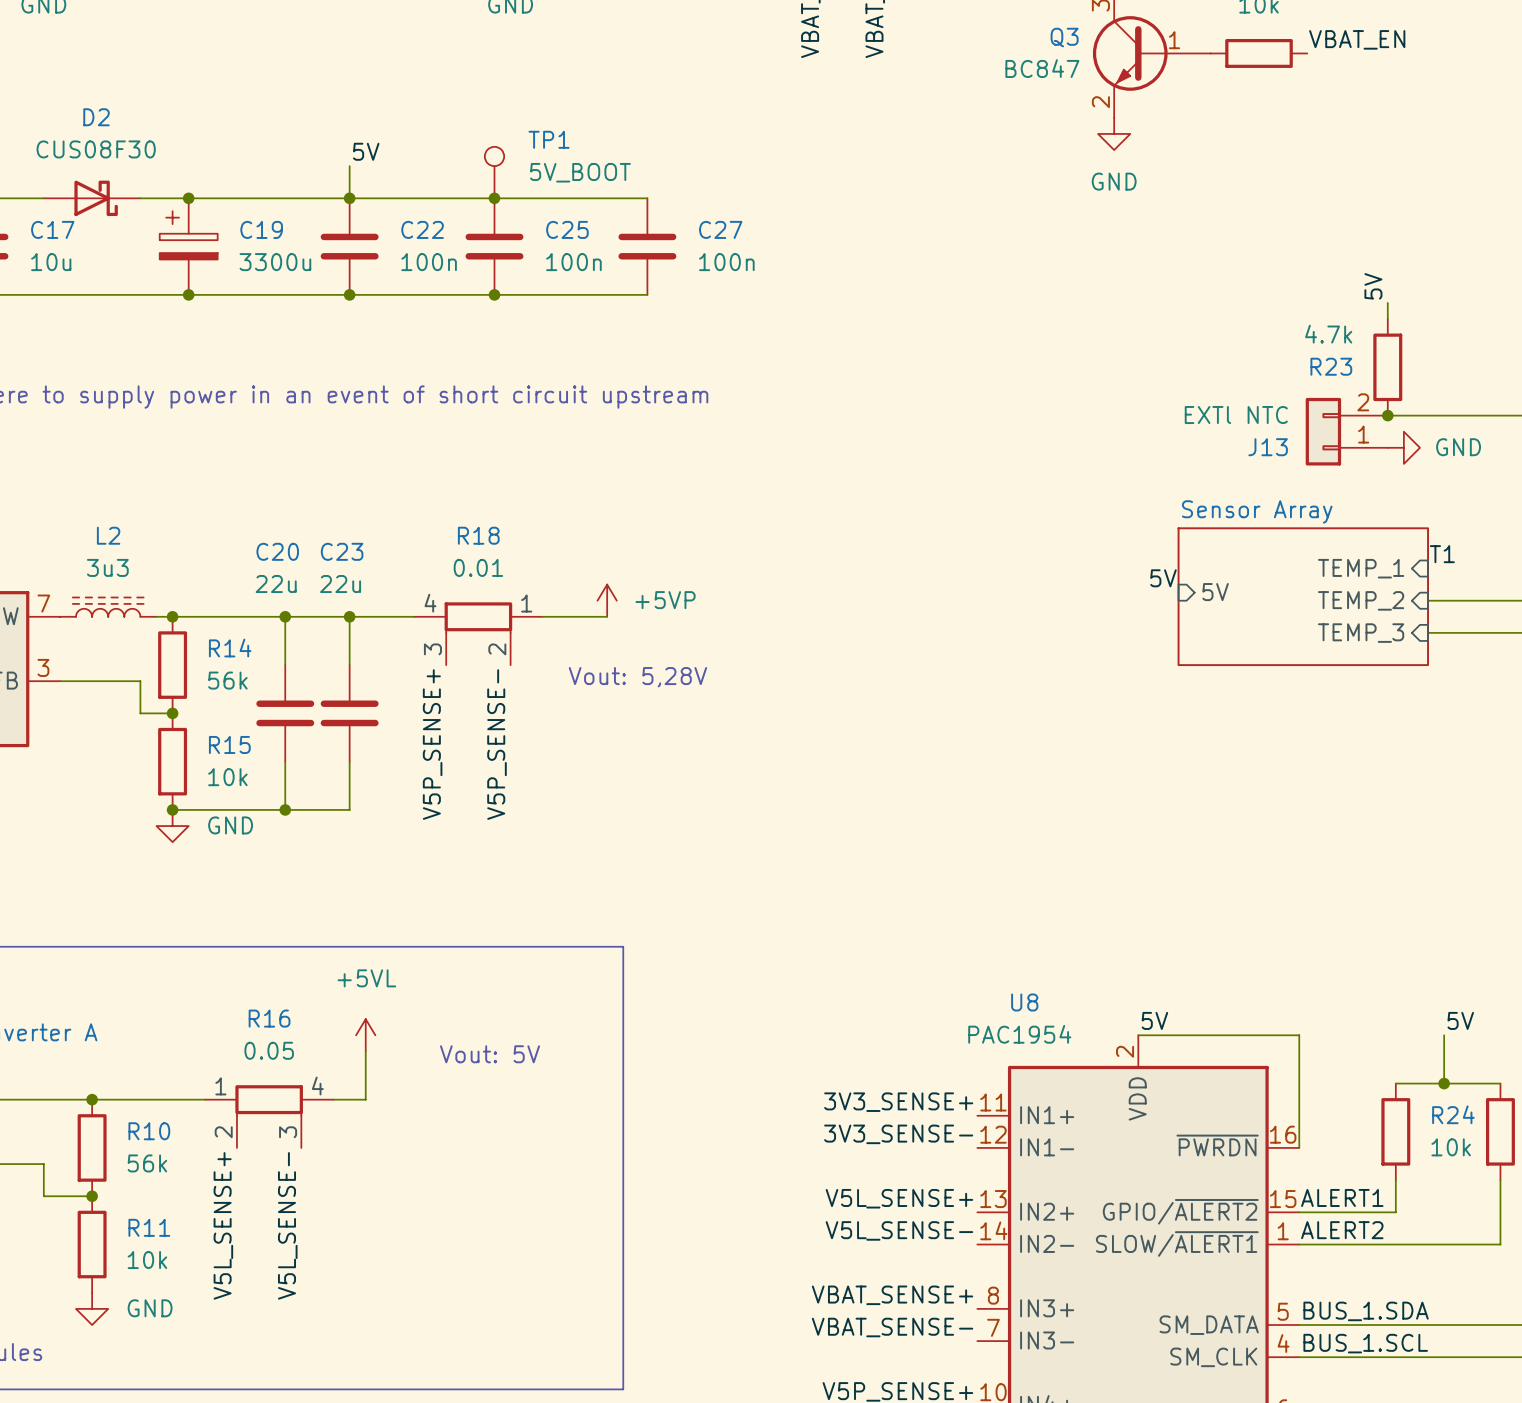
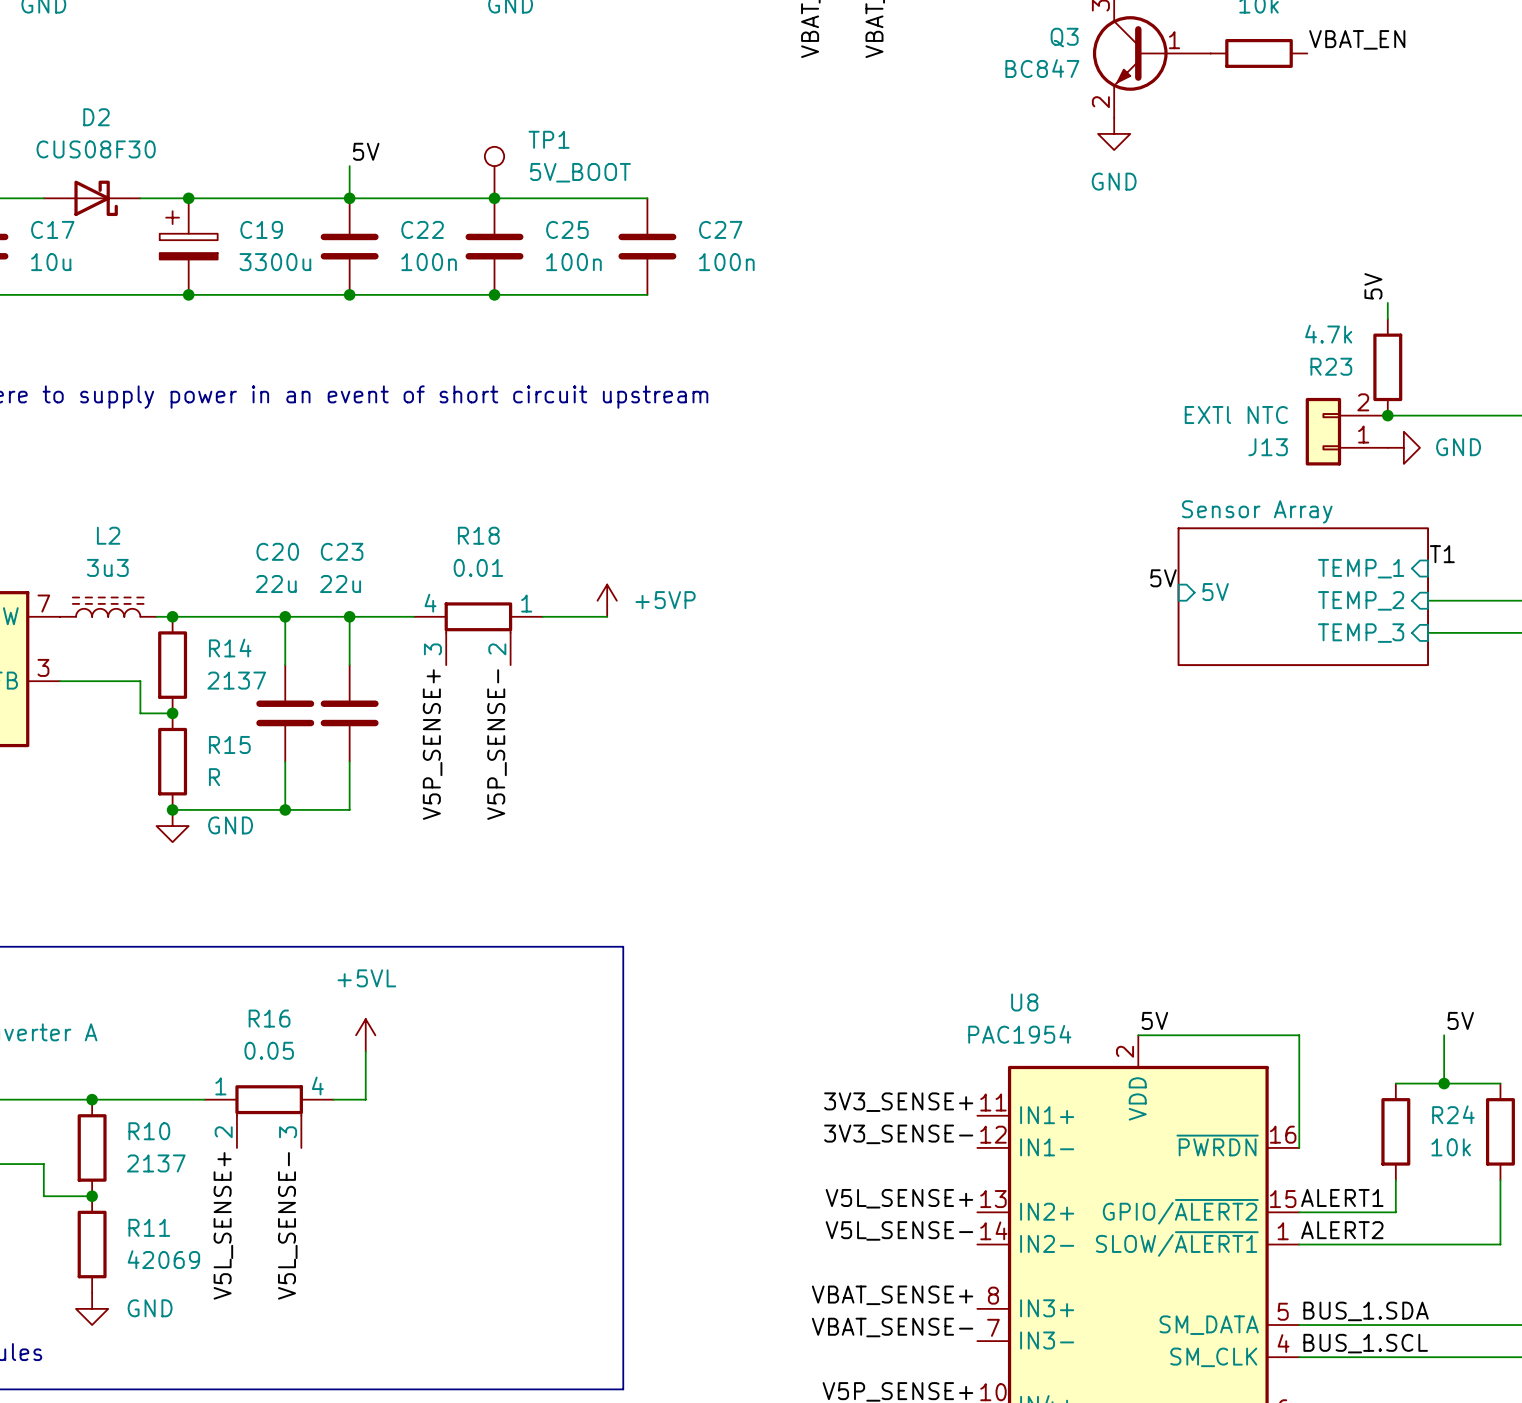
text: Vout: 5,28V (637, 677) -> none
R14 value: 56k (227, 680) -> 2137 (236, 680)
R15 value: 10k (227, 777) -> R (214, 777)
text: Vout: 5V (490, 1054) -> none
R10 value: 56k (147, 1163) -> 2137 (156, 1163)
R11 value: 10k (147, 1260) -> 42069 (163, 1259)

